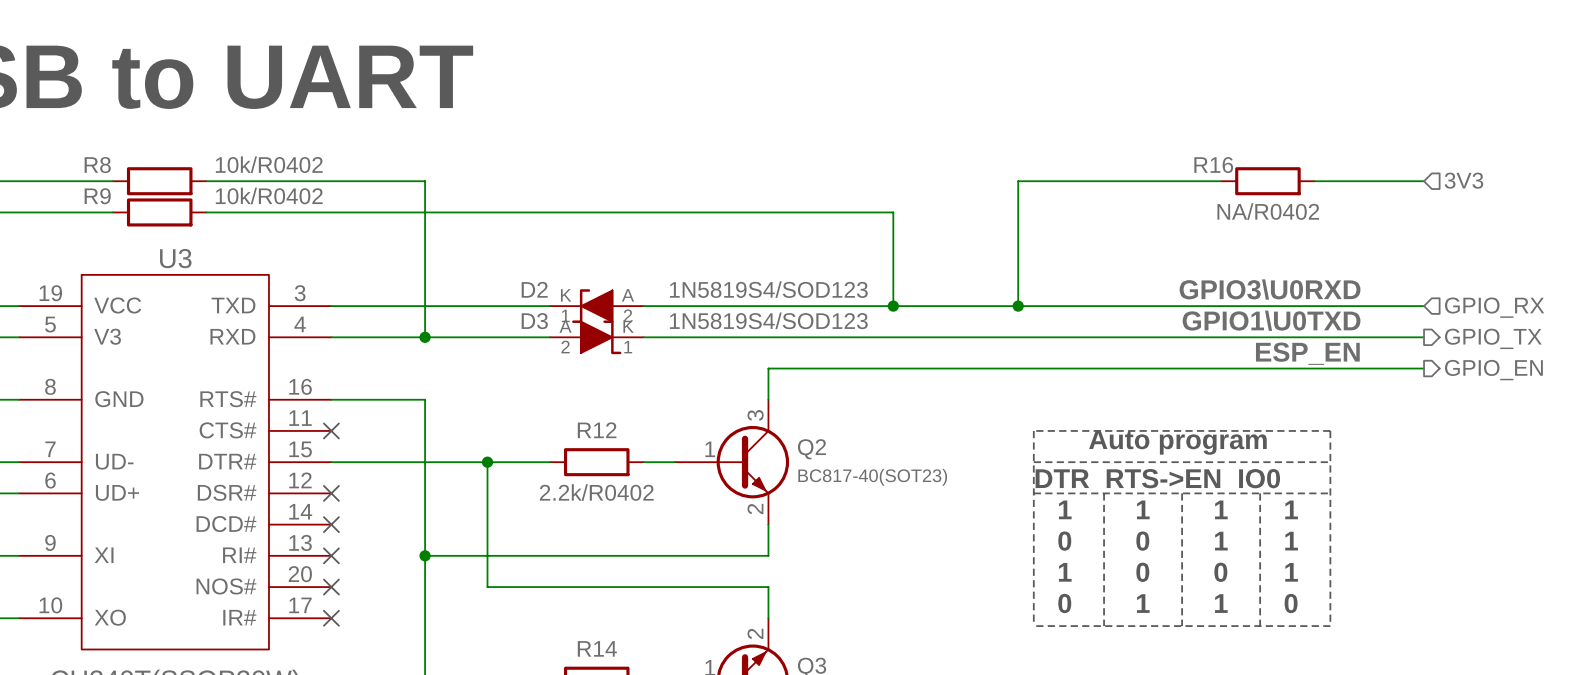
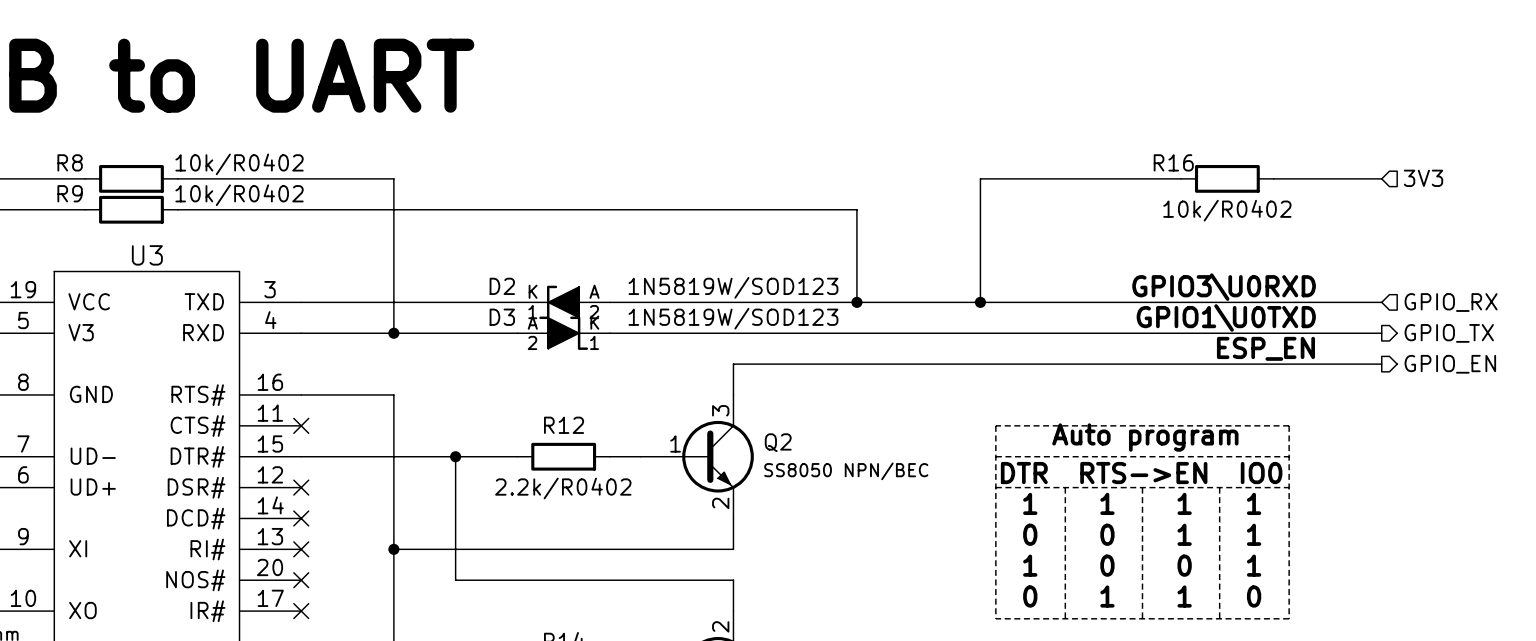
R16 value: NA/R0402 (1268, 211) -> 10k/R0402 (1227, 210)
D2 value: 1N5819S4/SOD123 (768, 289) -> 1N5819W/SOD123 (733, 287)
D3 value: 1N5819S4/SOD123 (768, 320) -> 1N5819W/SOD123 (733, 318)
Q2 value: BC817-40(SOT23) (872, 477) -> SS8050 NPN/BEC (846, 471)

